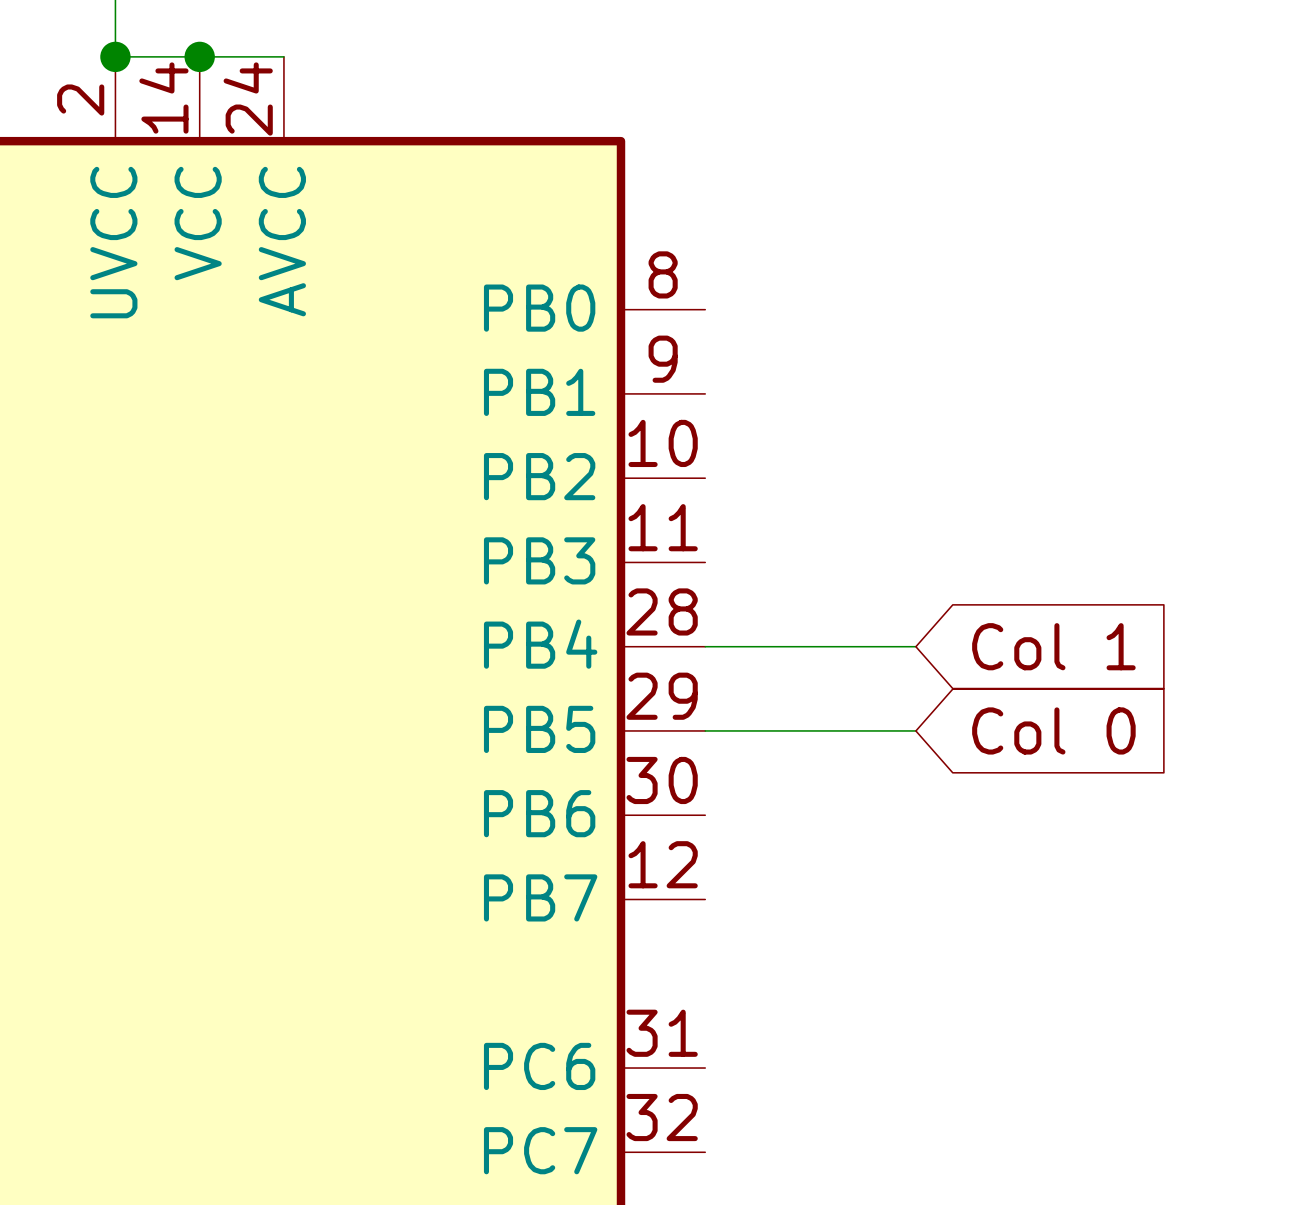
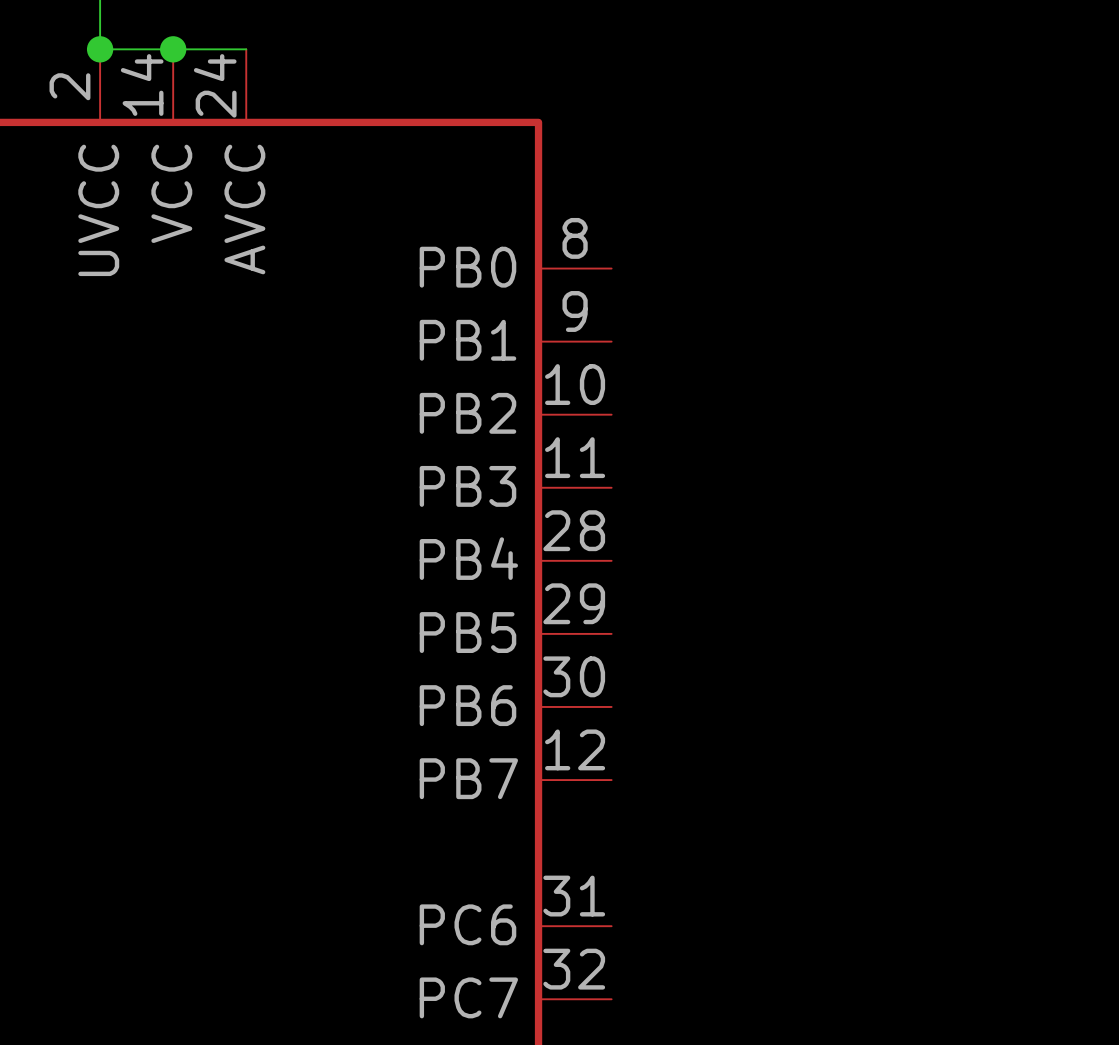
wire: (705, 646) (915, 646) -> none
global label: Col 1 (1053, 646) -> none
wire: (705, 730) (915, 730) -> none
global label: Col 0 (1053, 730) -> none

